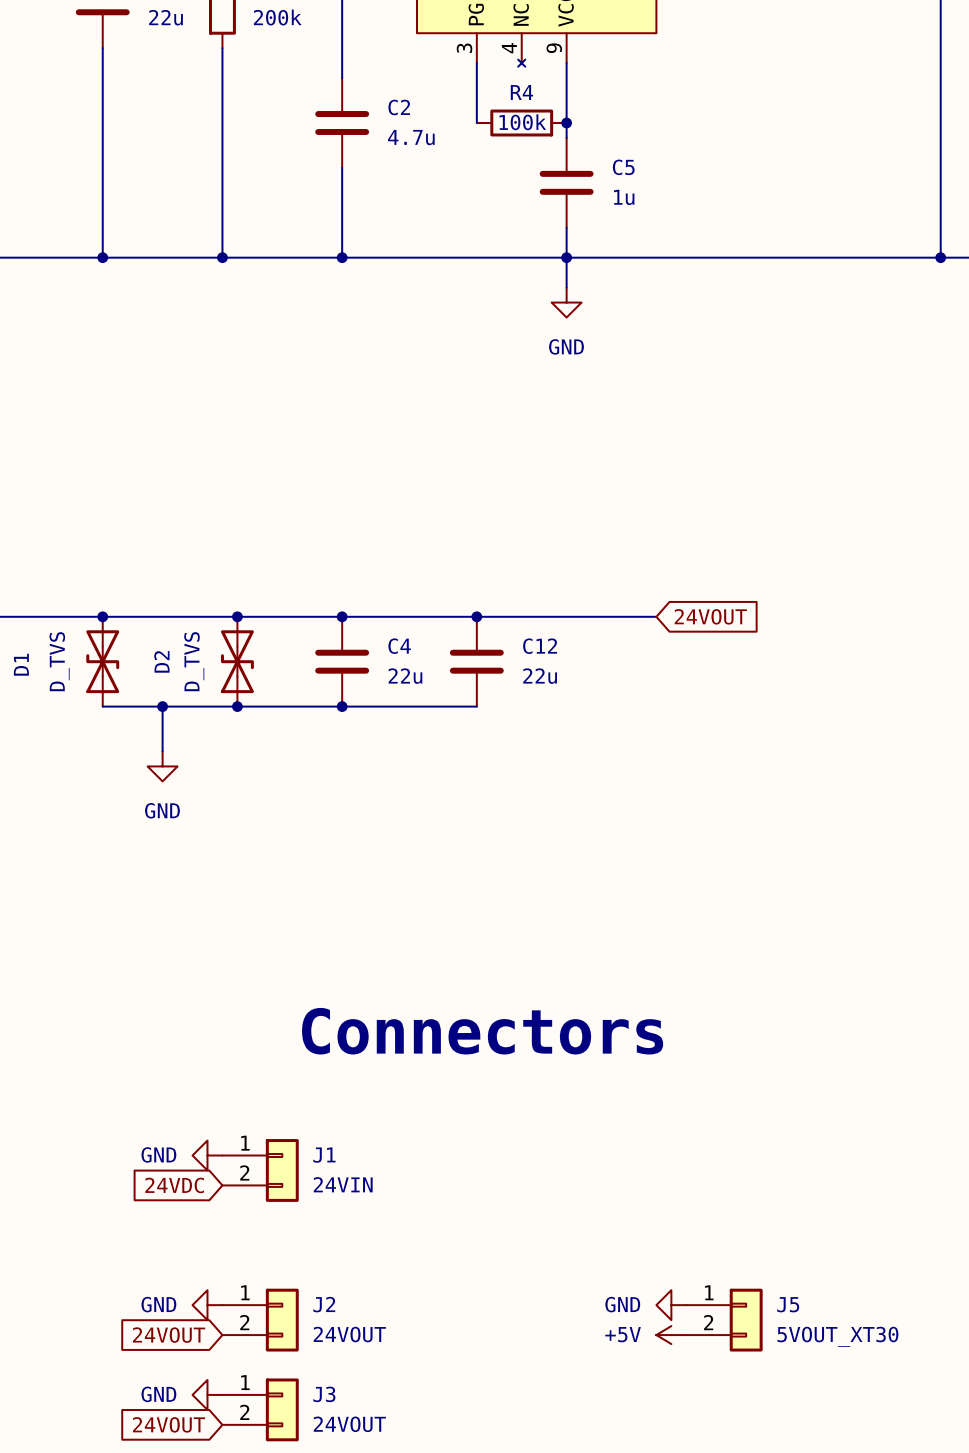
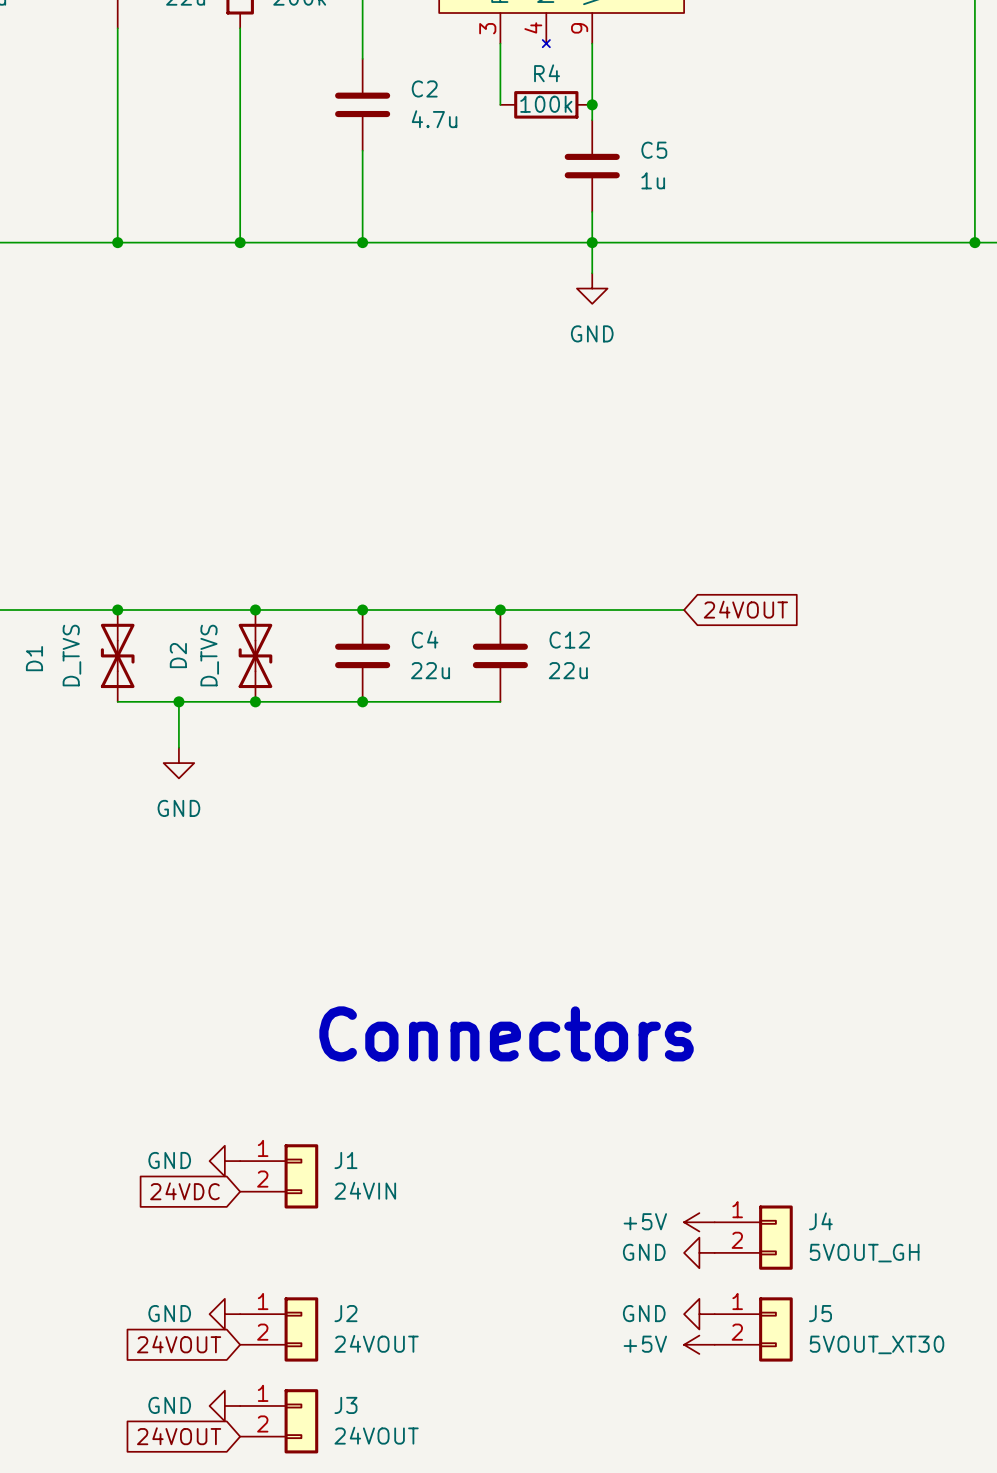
power symbol: none -> +5V (699, 1222)
J4: none -> 5VOUT_GH (753, 1237)
power symbol: none -> GND (699, 1252)

